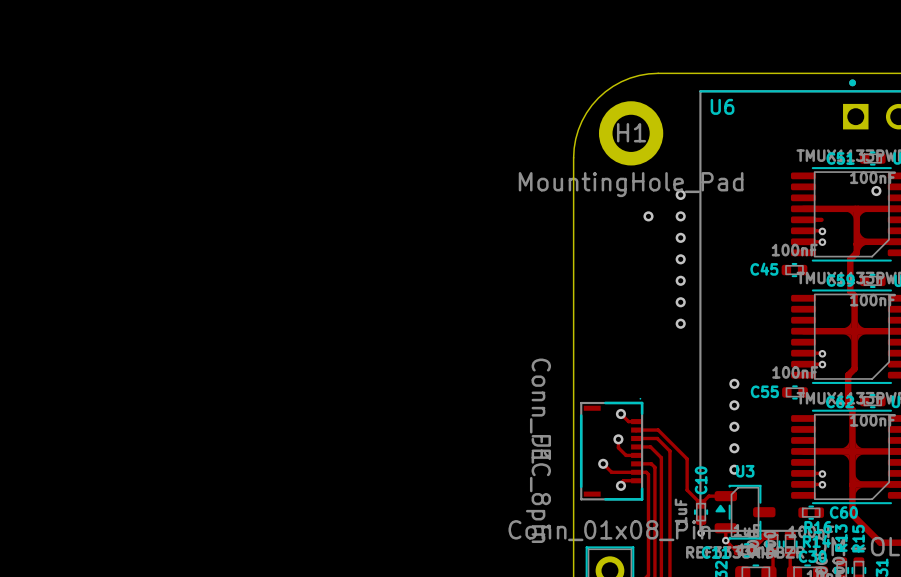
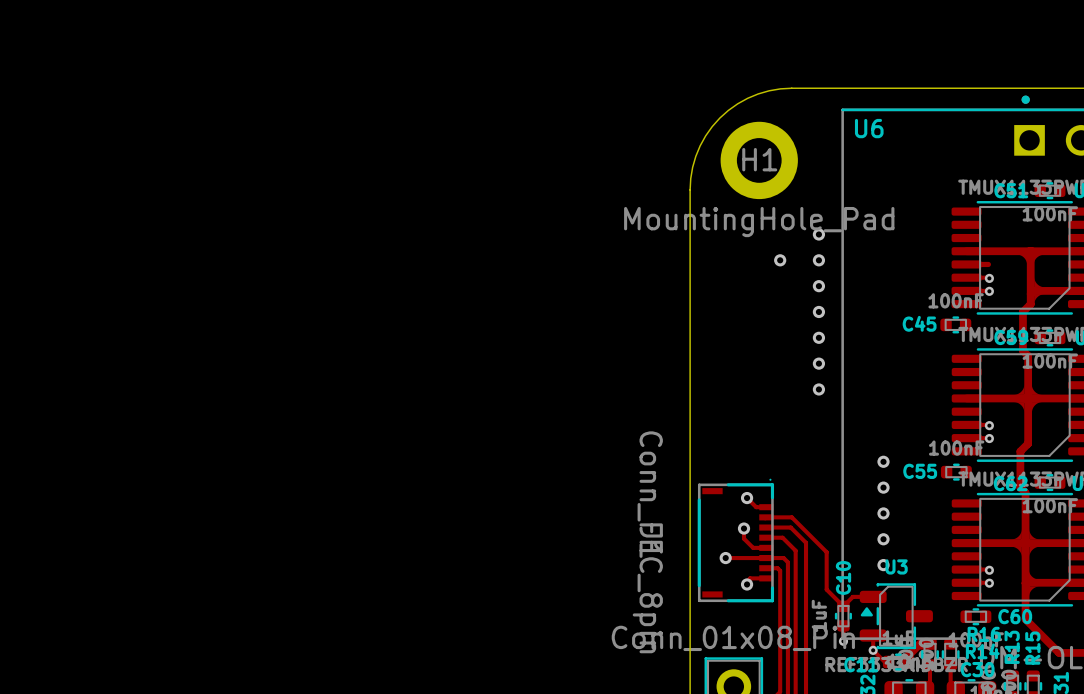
via: (876, 191) -> none
track: (603, 463) (611, 472) (637, 472) -> none
track: none -> (728, 558) (766, 558)

